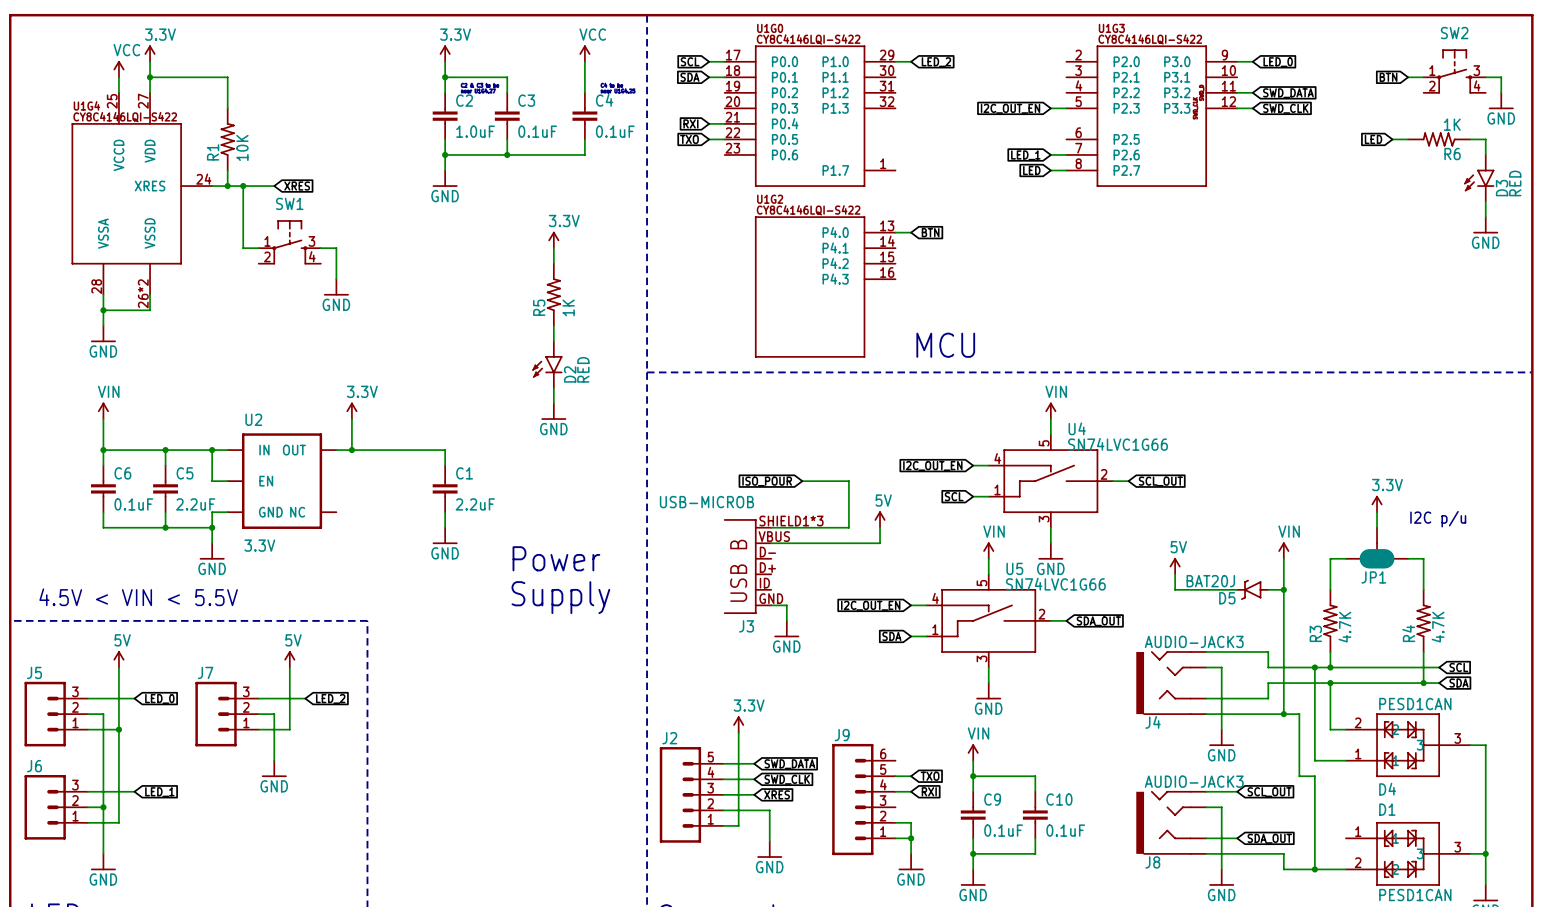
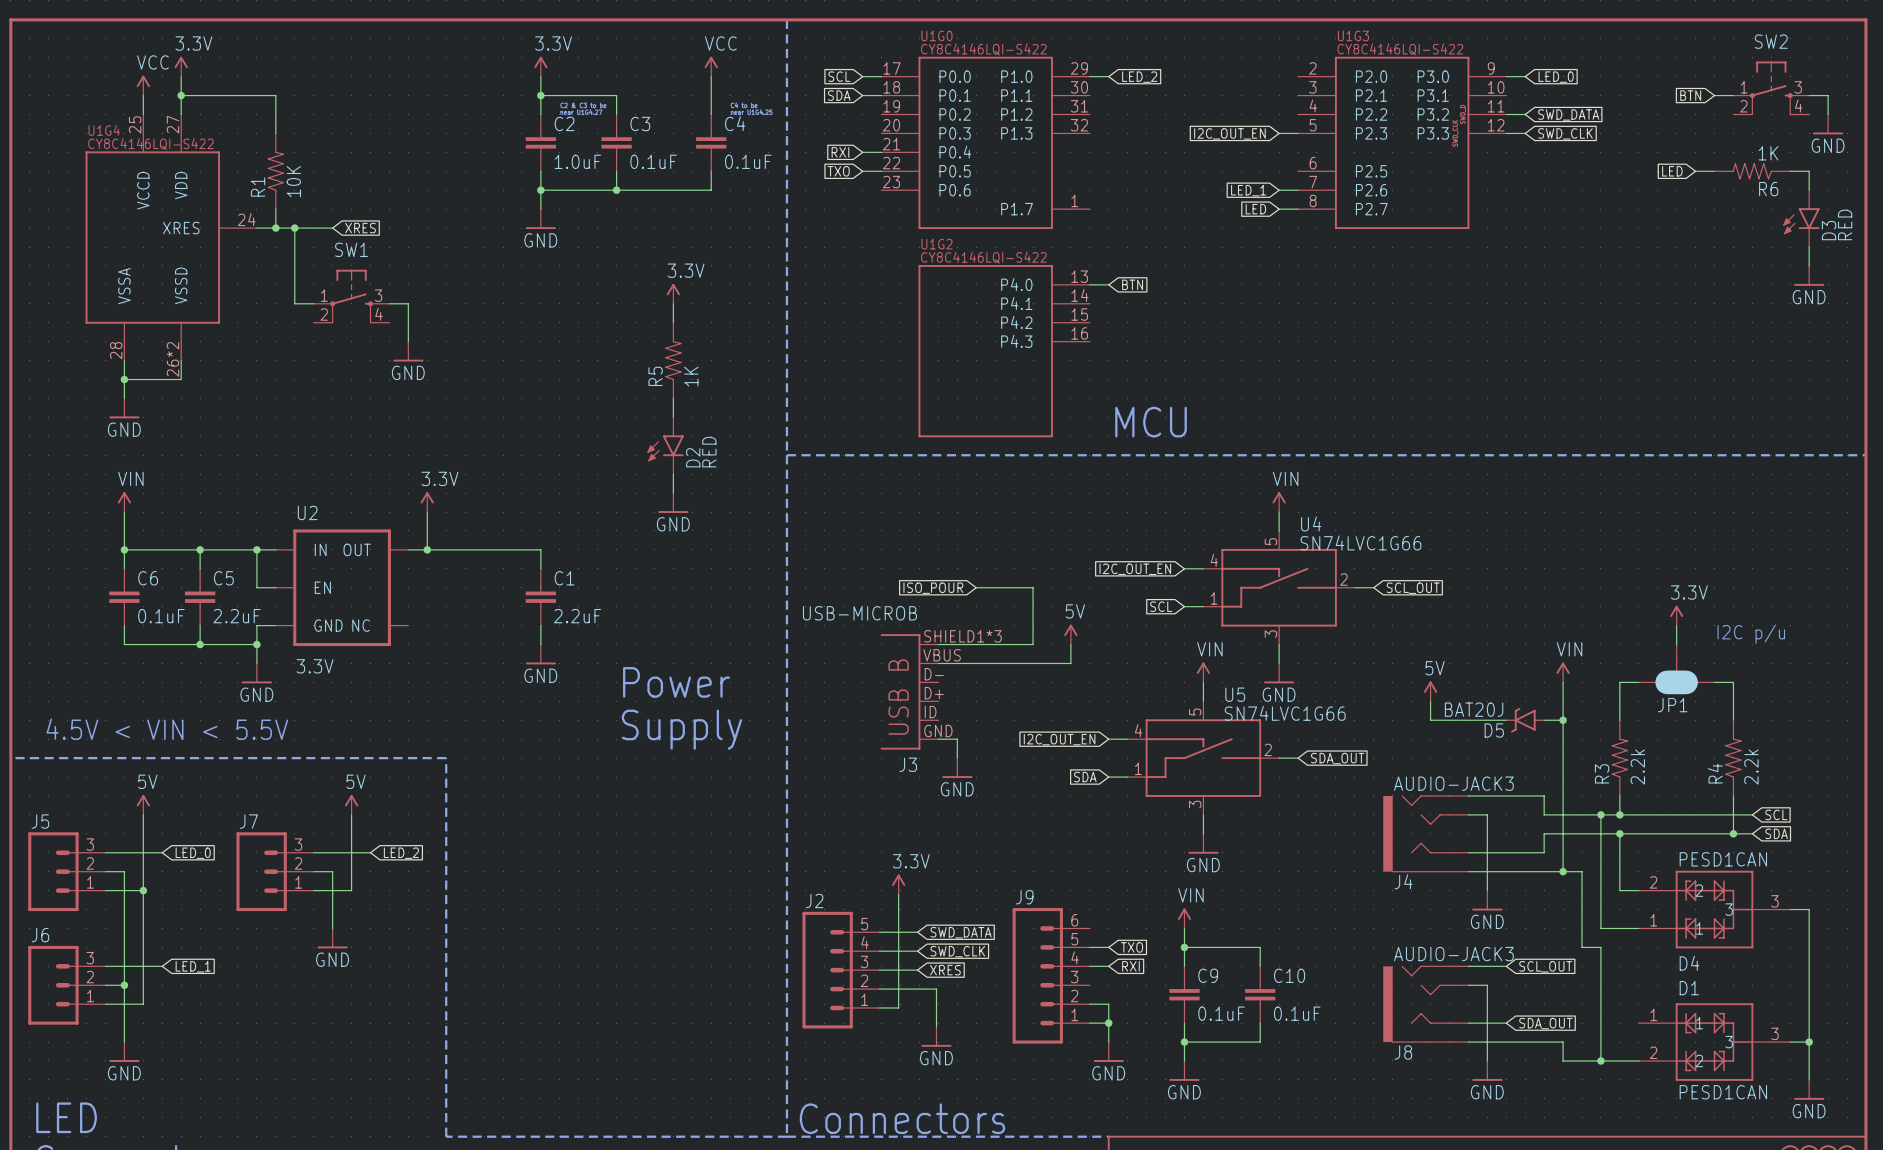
R3 value: 4.7K (1344, 627) -> 2.2k (1637, 767)
R4 value: 4.7K (1438, 627) -> 2.2k (1751, 767)

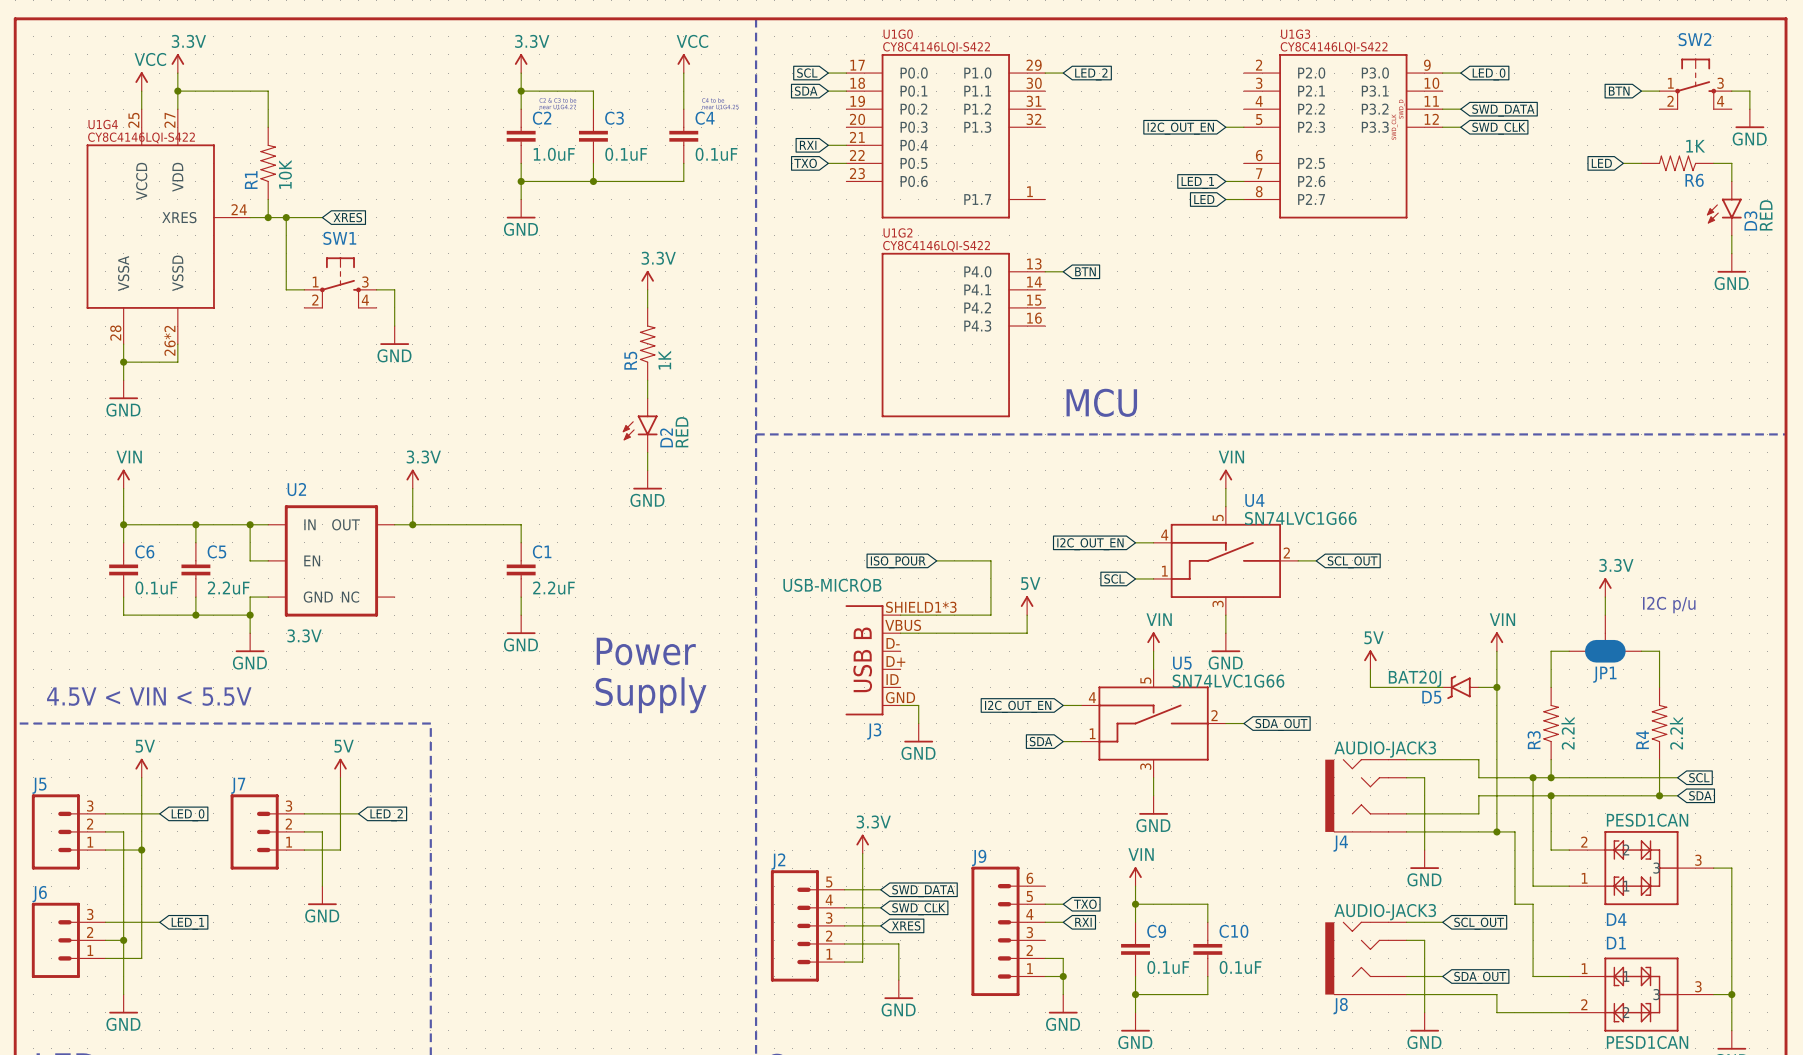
wire: (1600, 1023) (1600, 1060) -> (1533, 976) (1569, 976)
junction: (1600, 1060) -> none

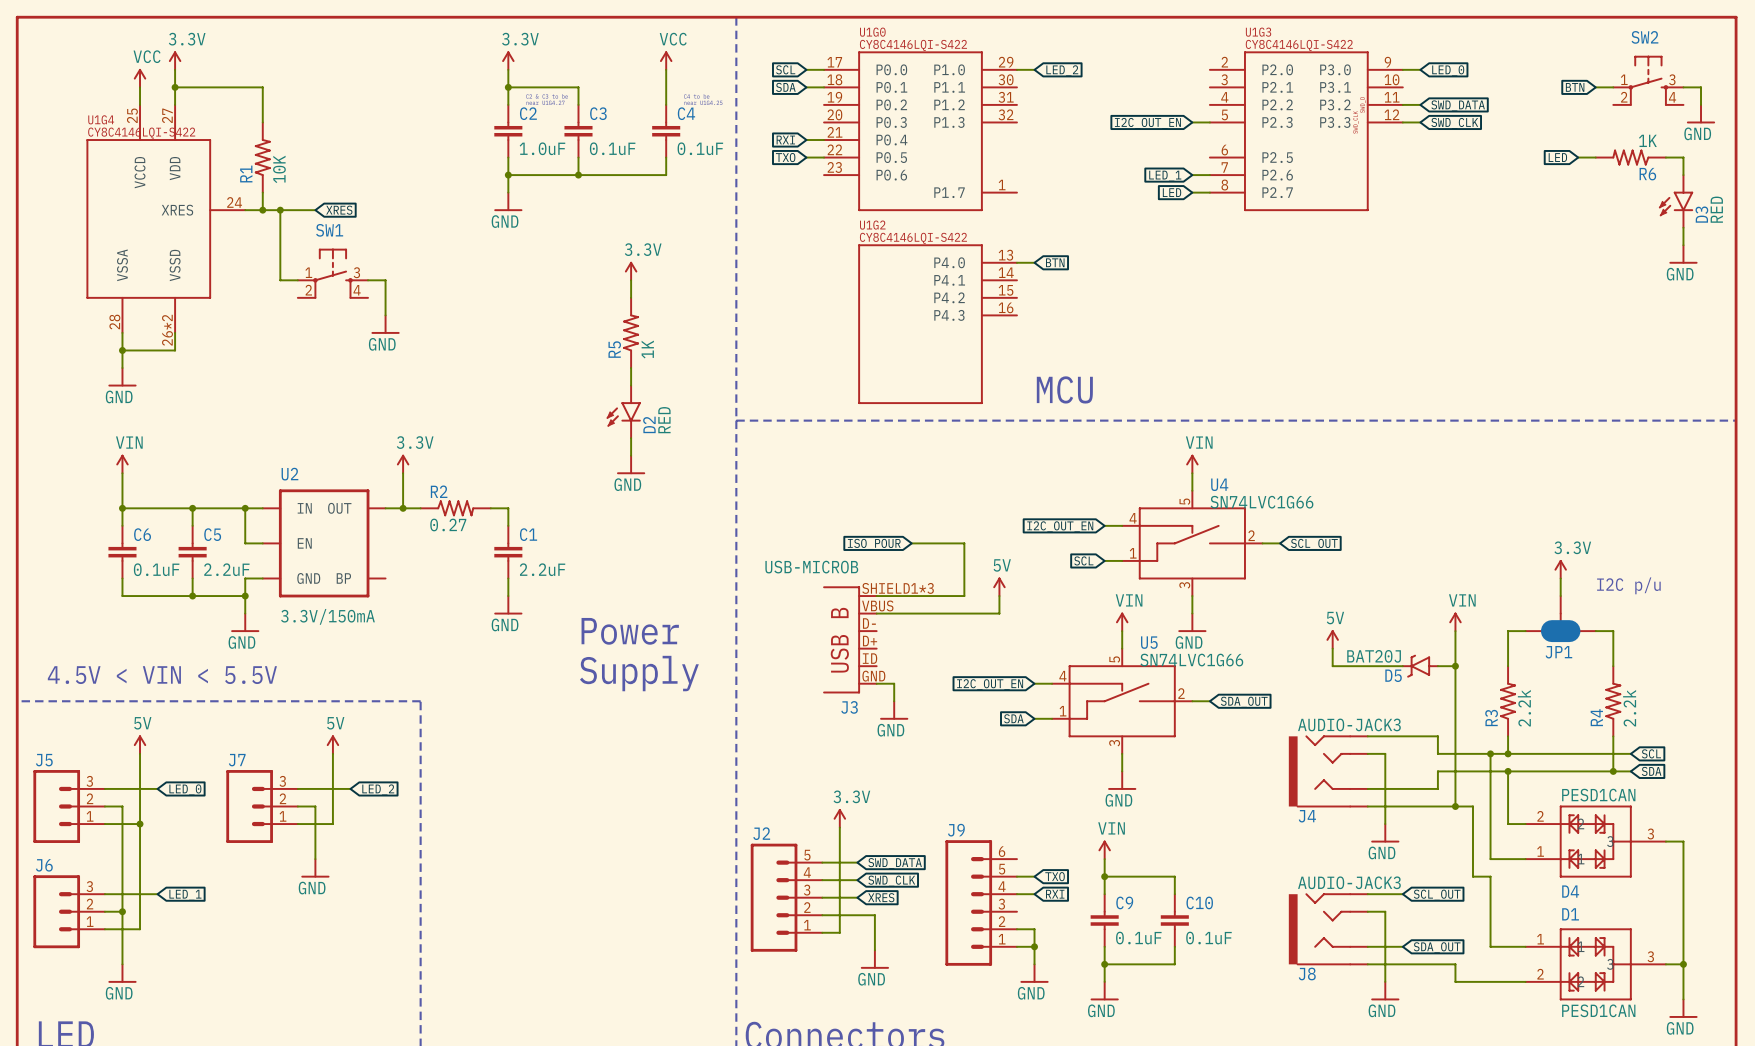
R2: none -> 0.27 (455, 508)
U2 pin name: NC (350, 597) -> BP (343, 578)
U2 value: 3.3V (304, 635) -> 3.3V/150mA (327, 616)

